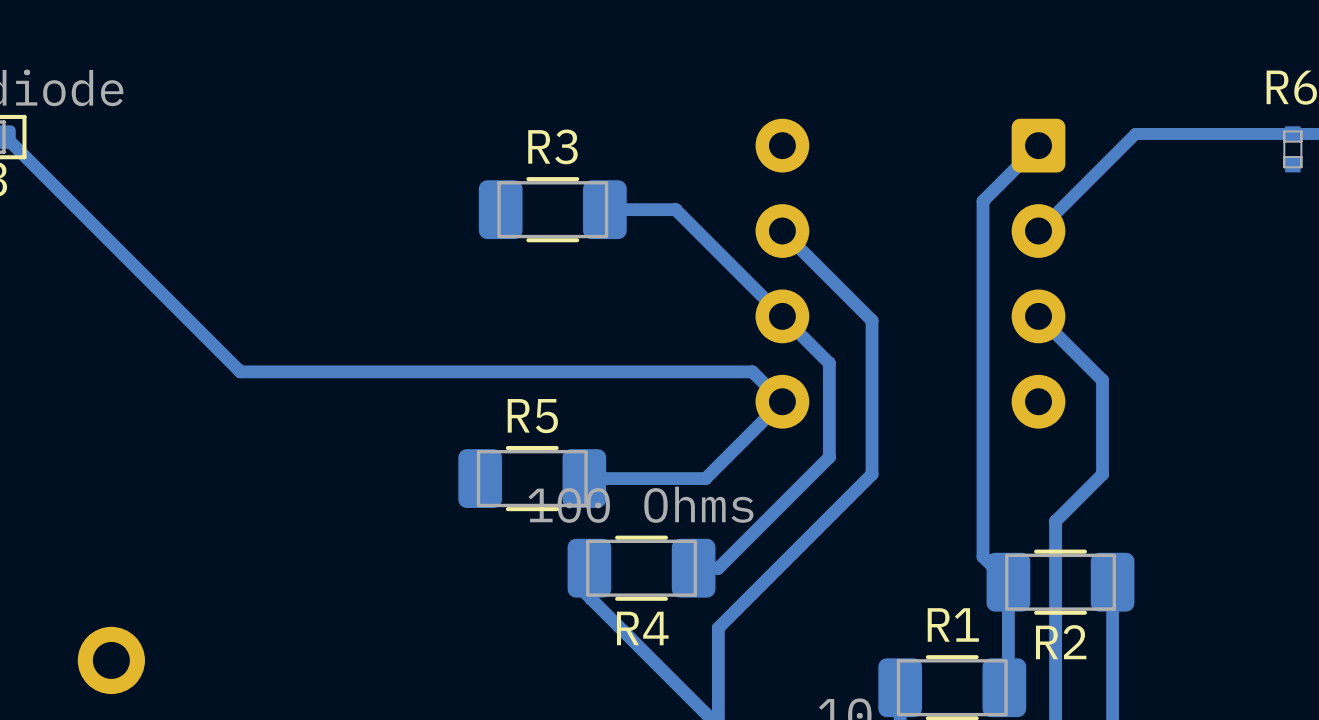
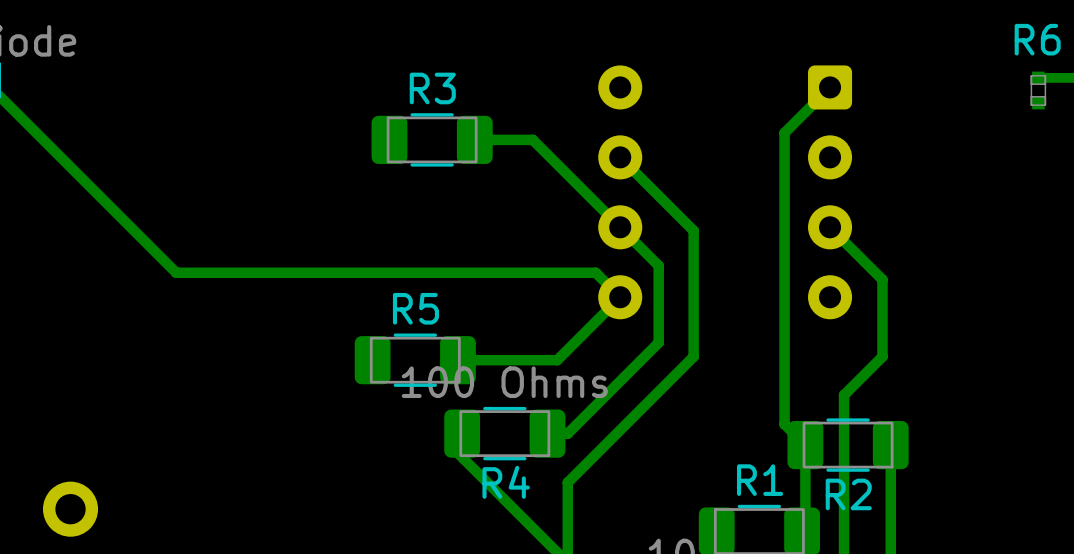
track: (1292, 133) (1135, 133) (1038, 231) -> none

